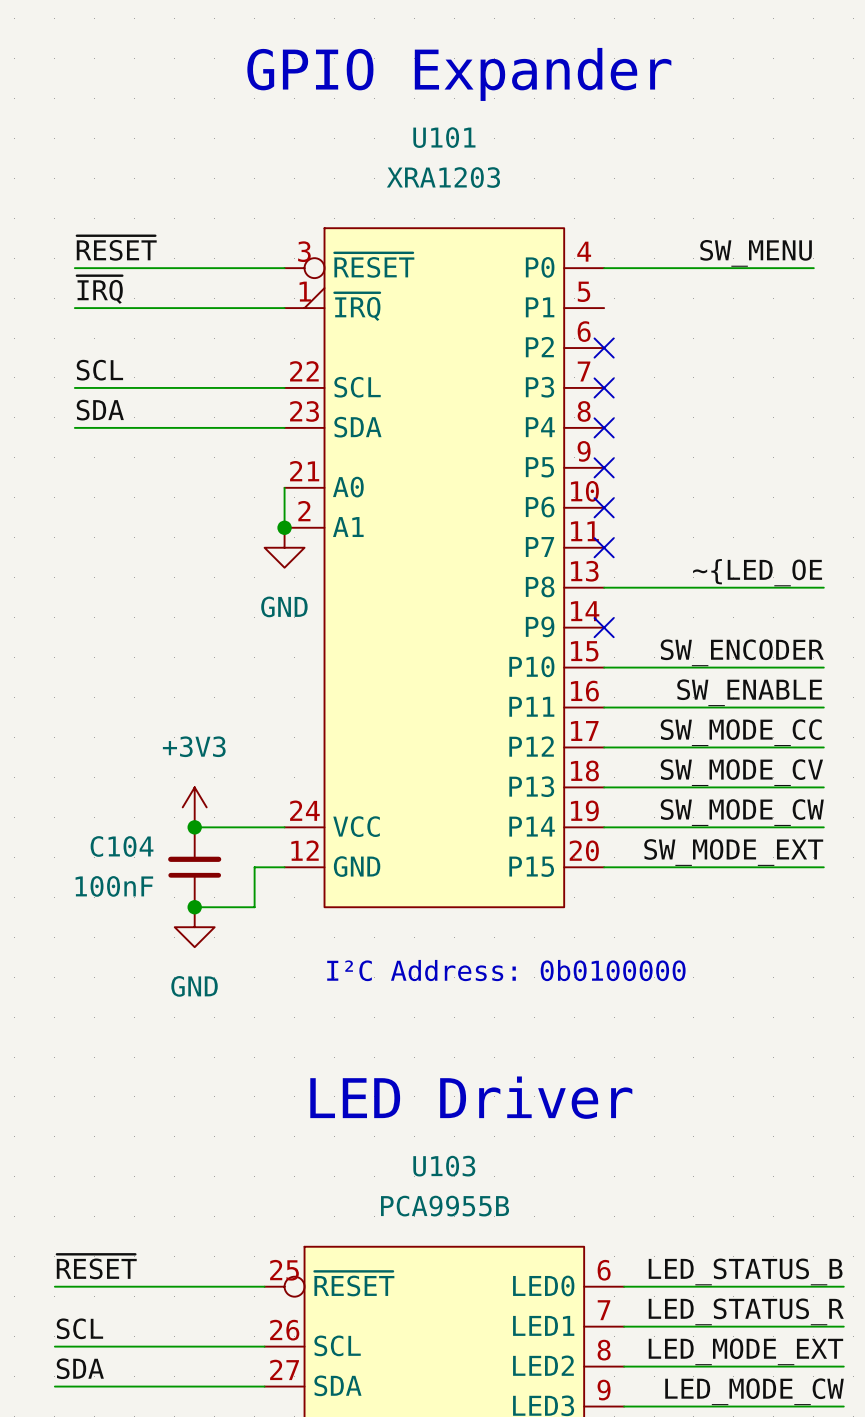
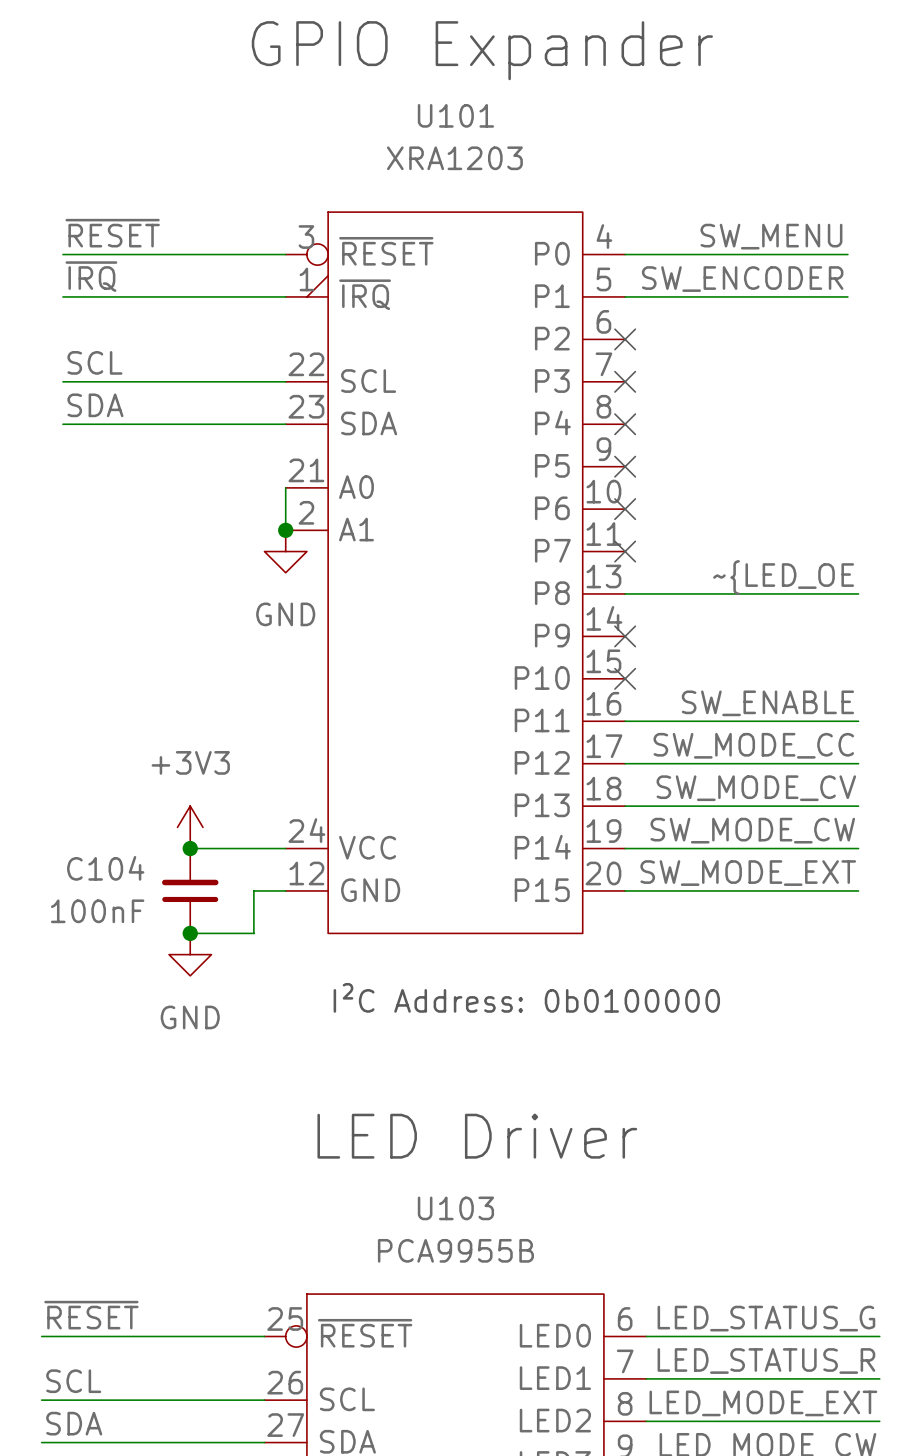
wire: none -> (625, 296) (847, 296)
label position: SW_ENCODER (742, 652) -> SW_ENCODER (742, 279)
wire: (604, 667) (823, 667) -> none
no-connect mark: none -> (625, 678)
label: LED_STATUS_B (745, 1271) -> LED_STATUS_G (766, 1318)

